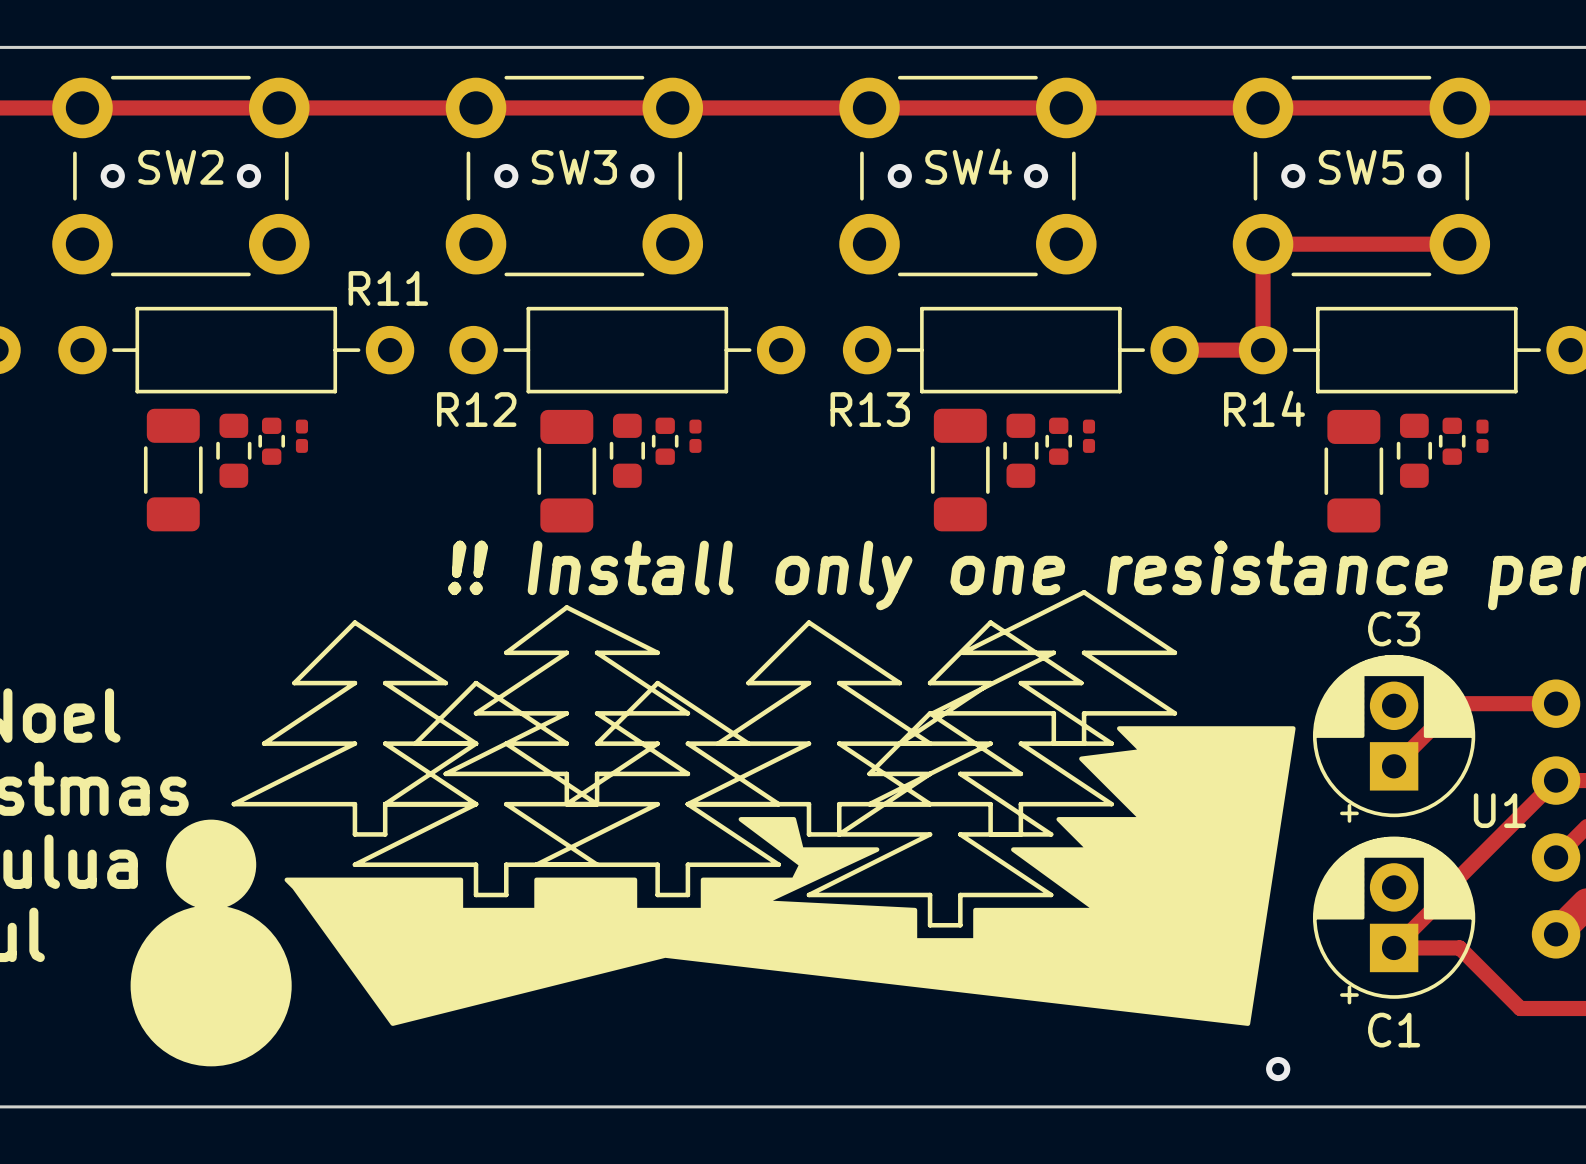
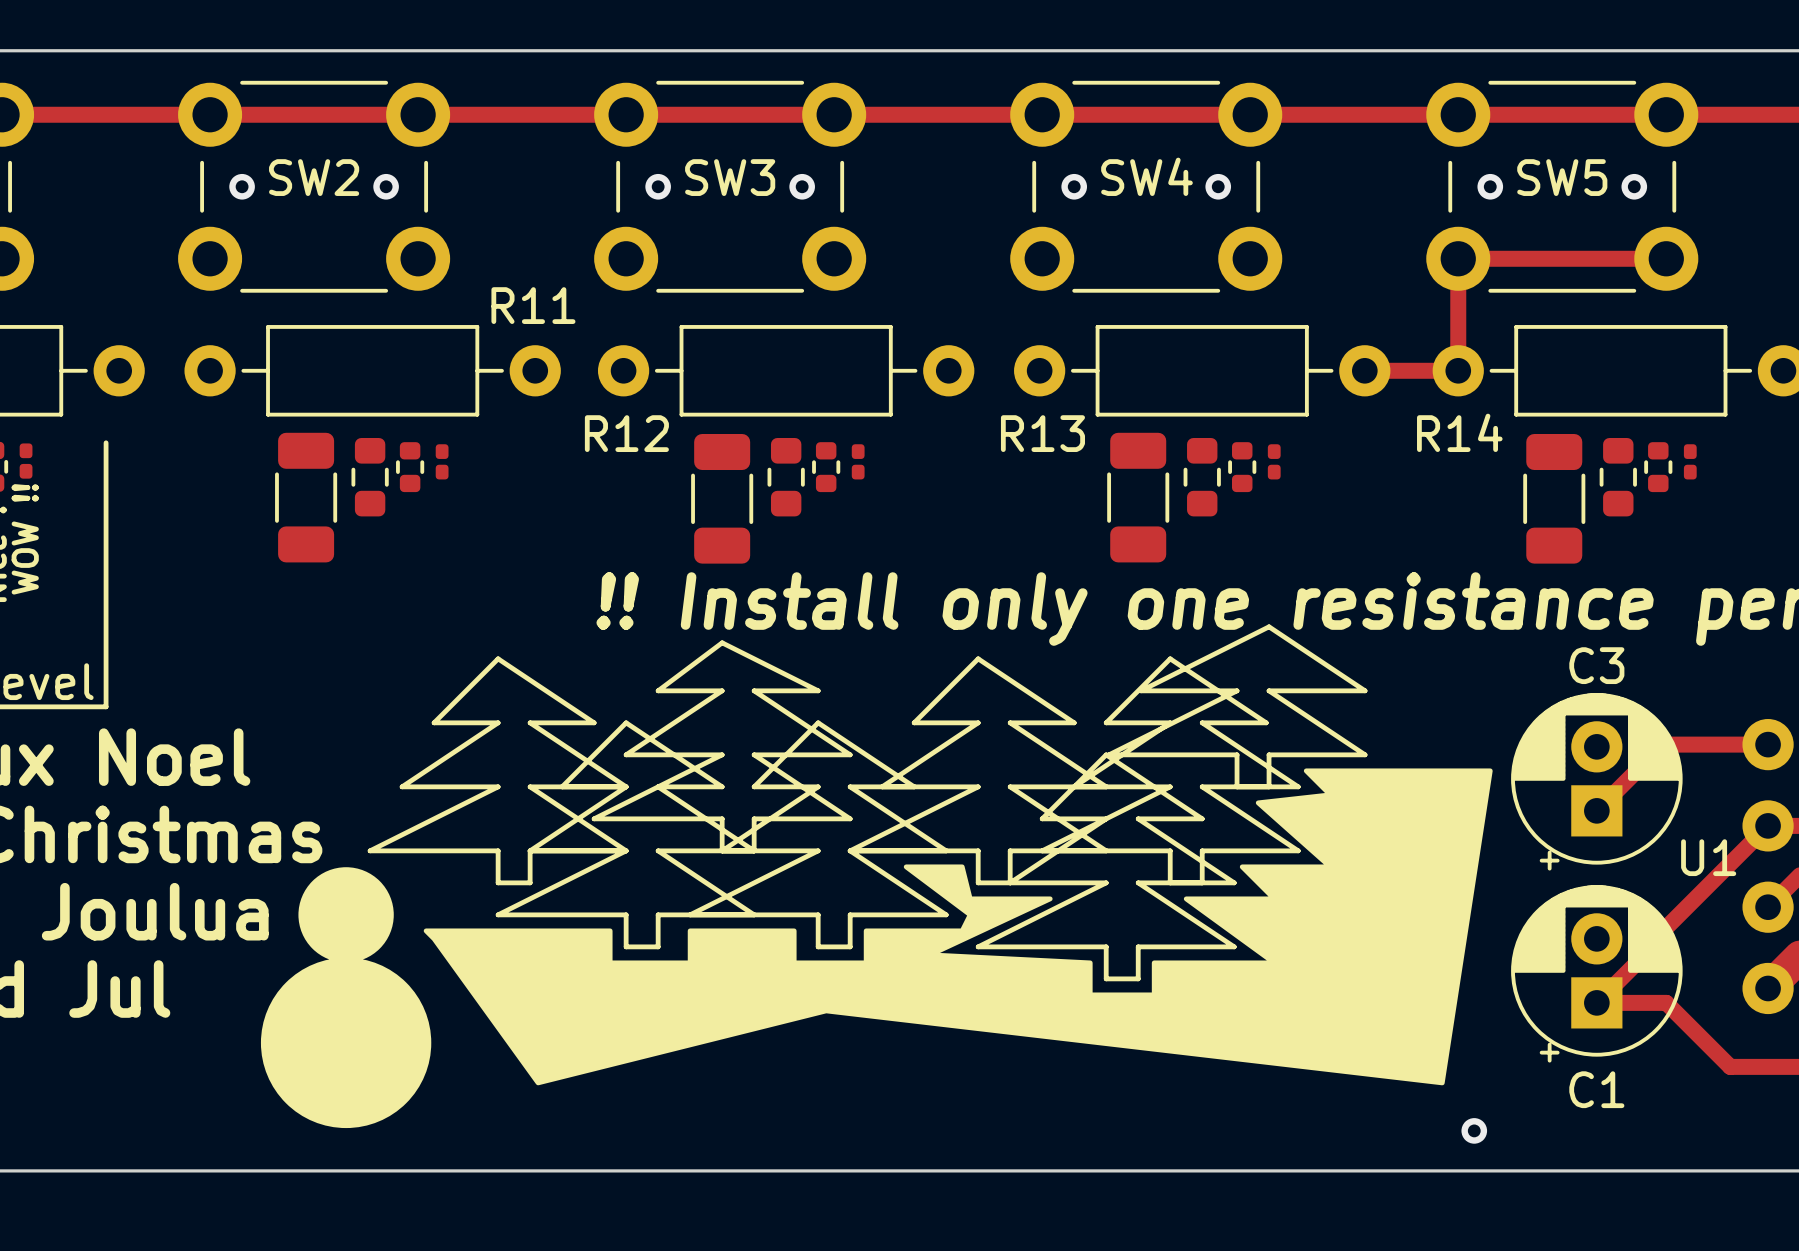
drawing shape: [284, 726, 1296, 1026] -> [423, 768, 1493, 1086]

